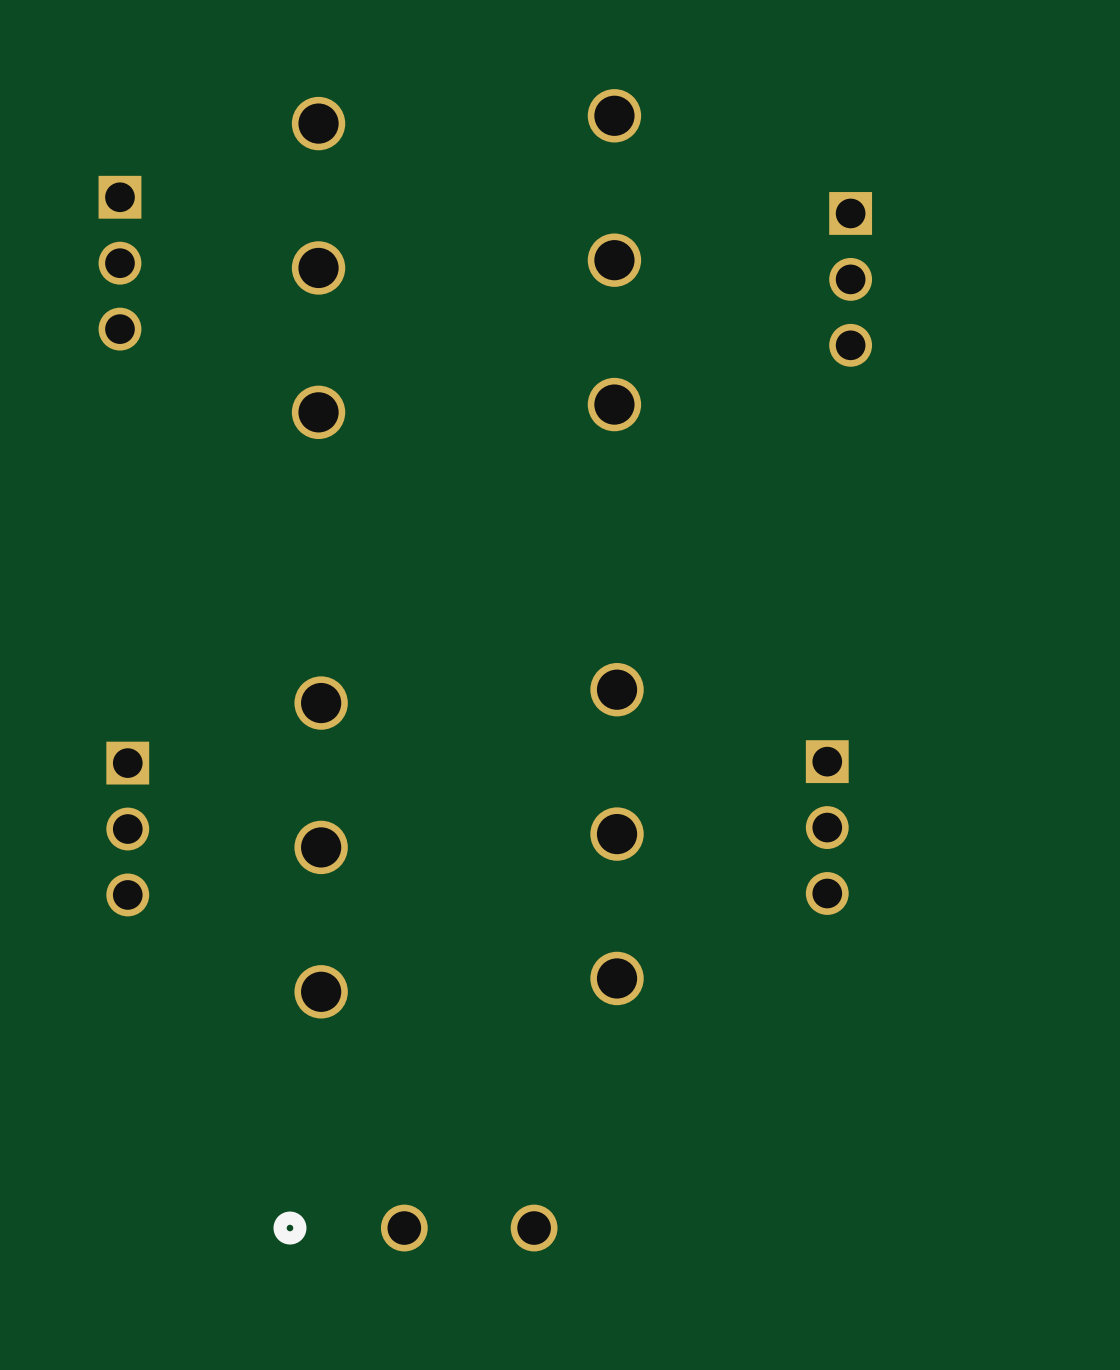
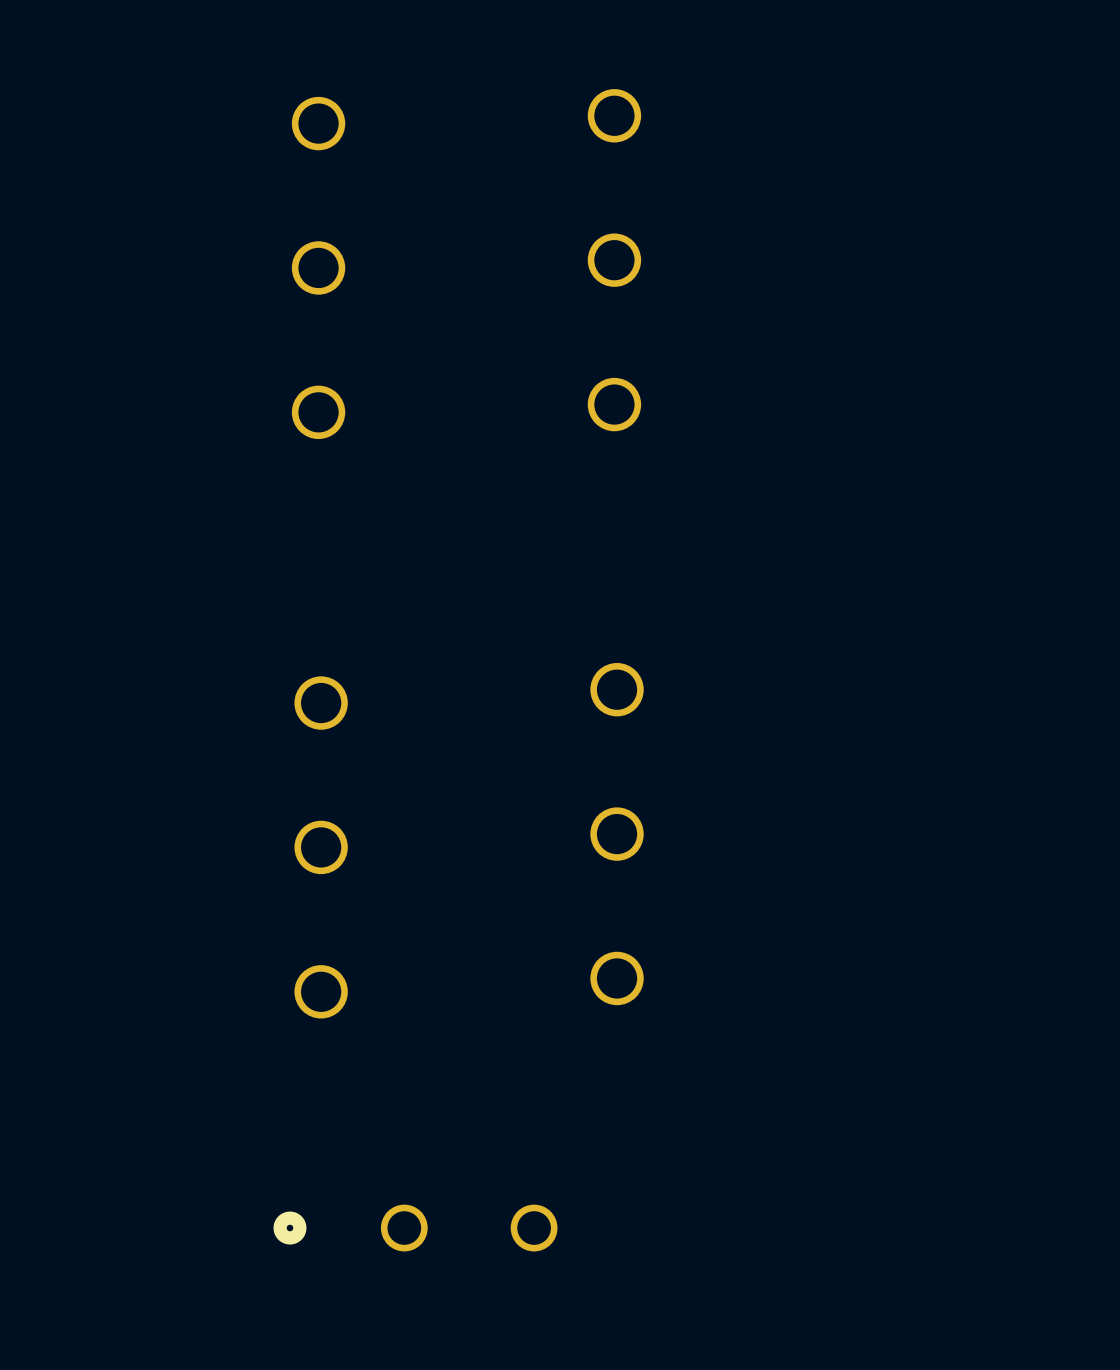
part: (119, 263) -> none
part: (850, 279) -> none
part: (827, 827) -> none
part: (127, 829) -> none

